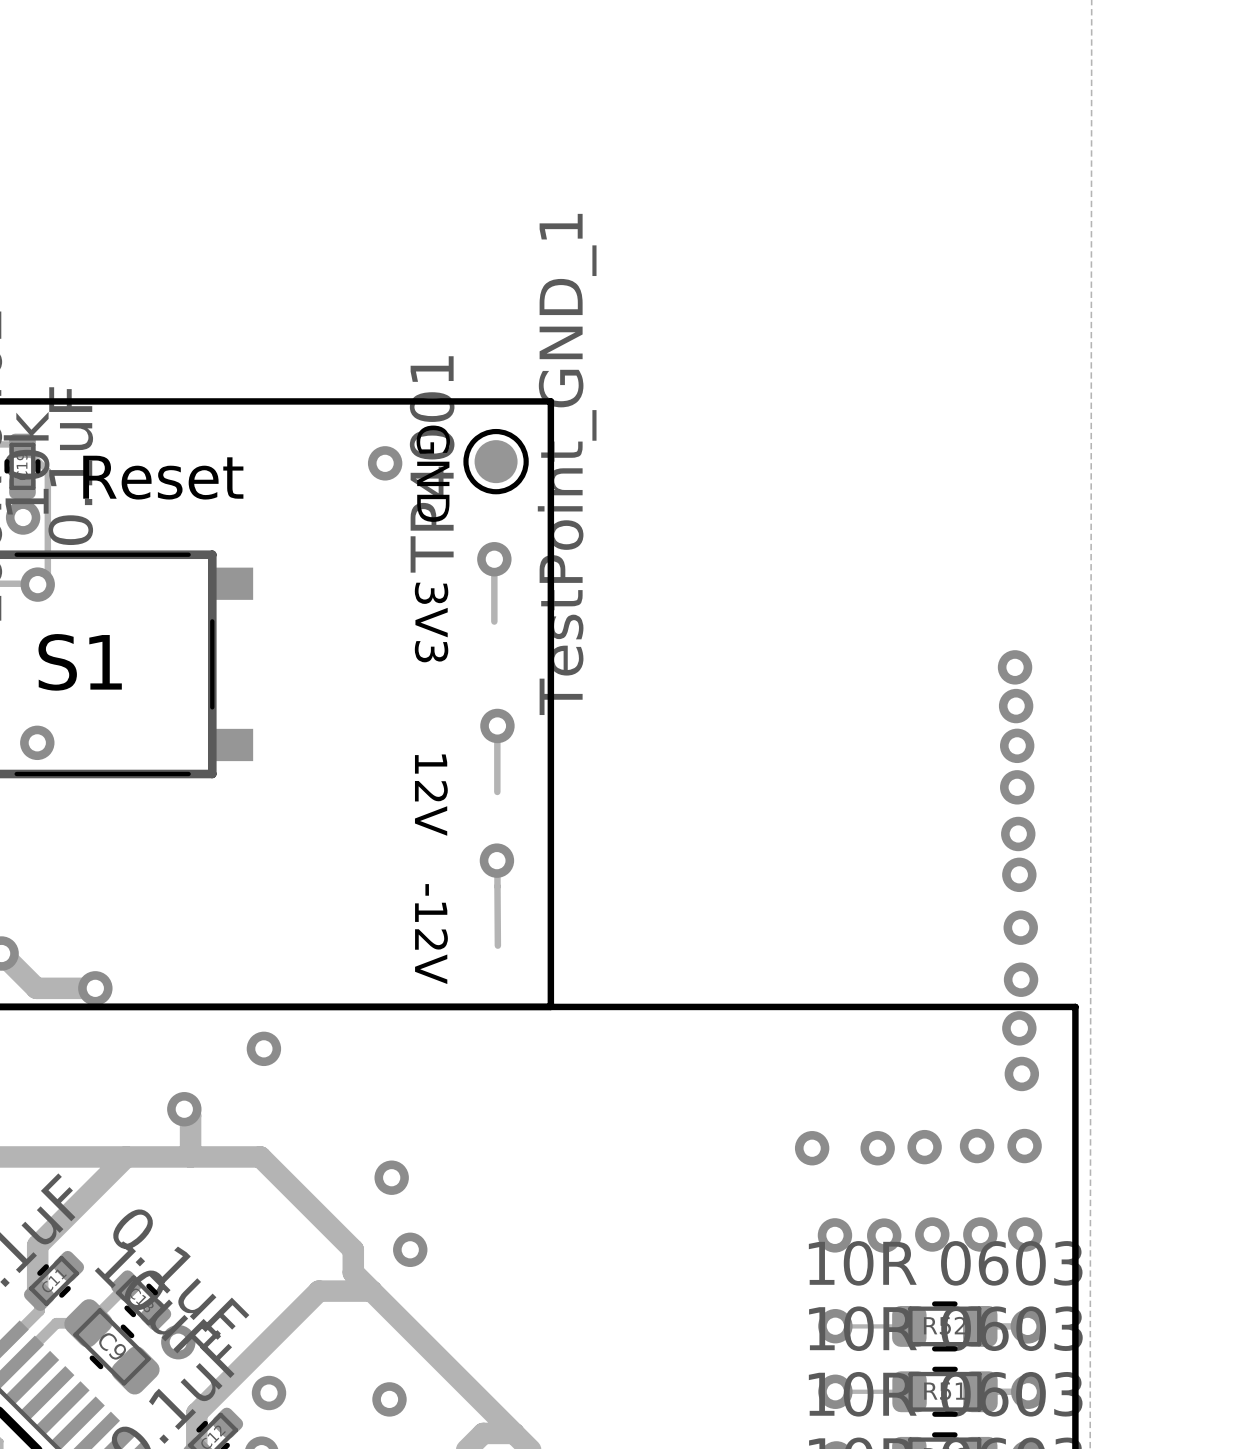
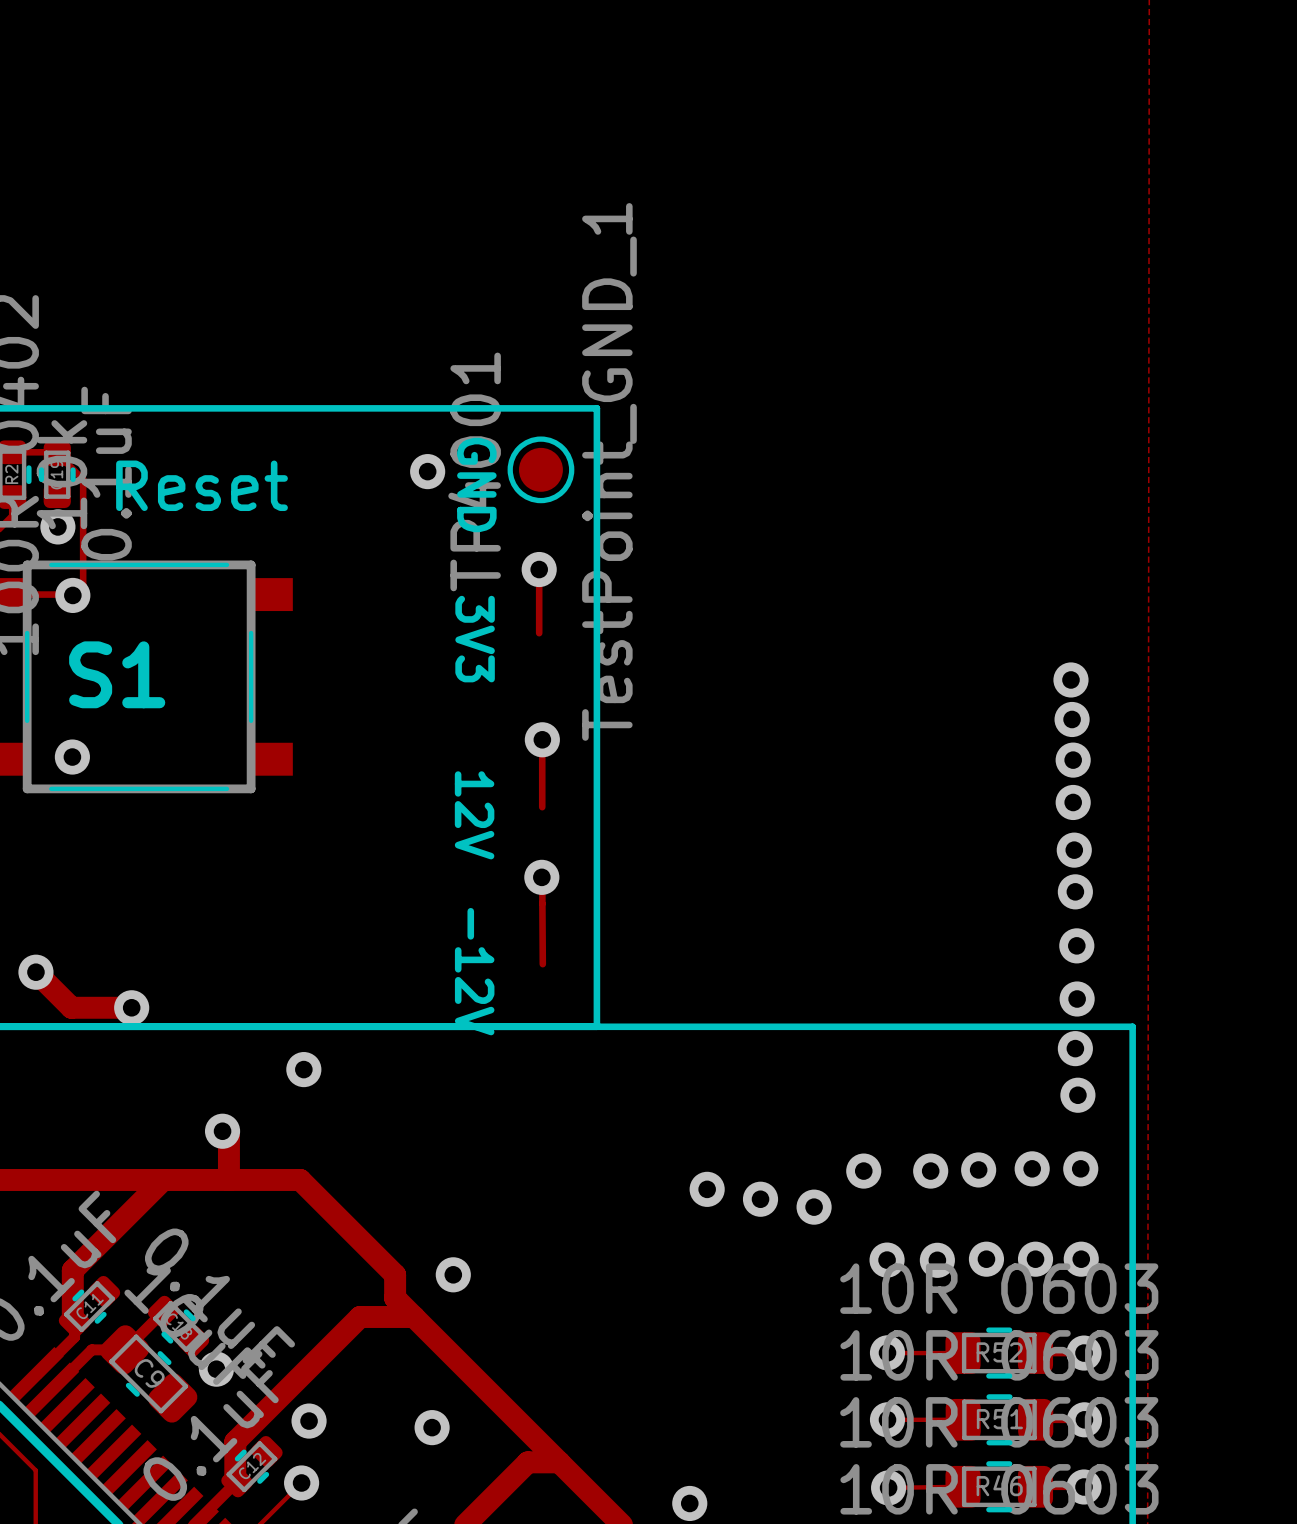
via: none -> (707, 1189)
via: none -> (760, 1199)
via: (391, 1177) -> none
via: none -> (814, 1207)

